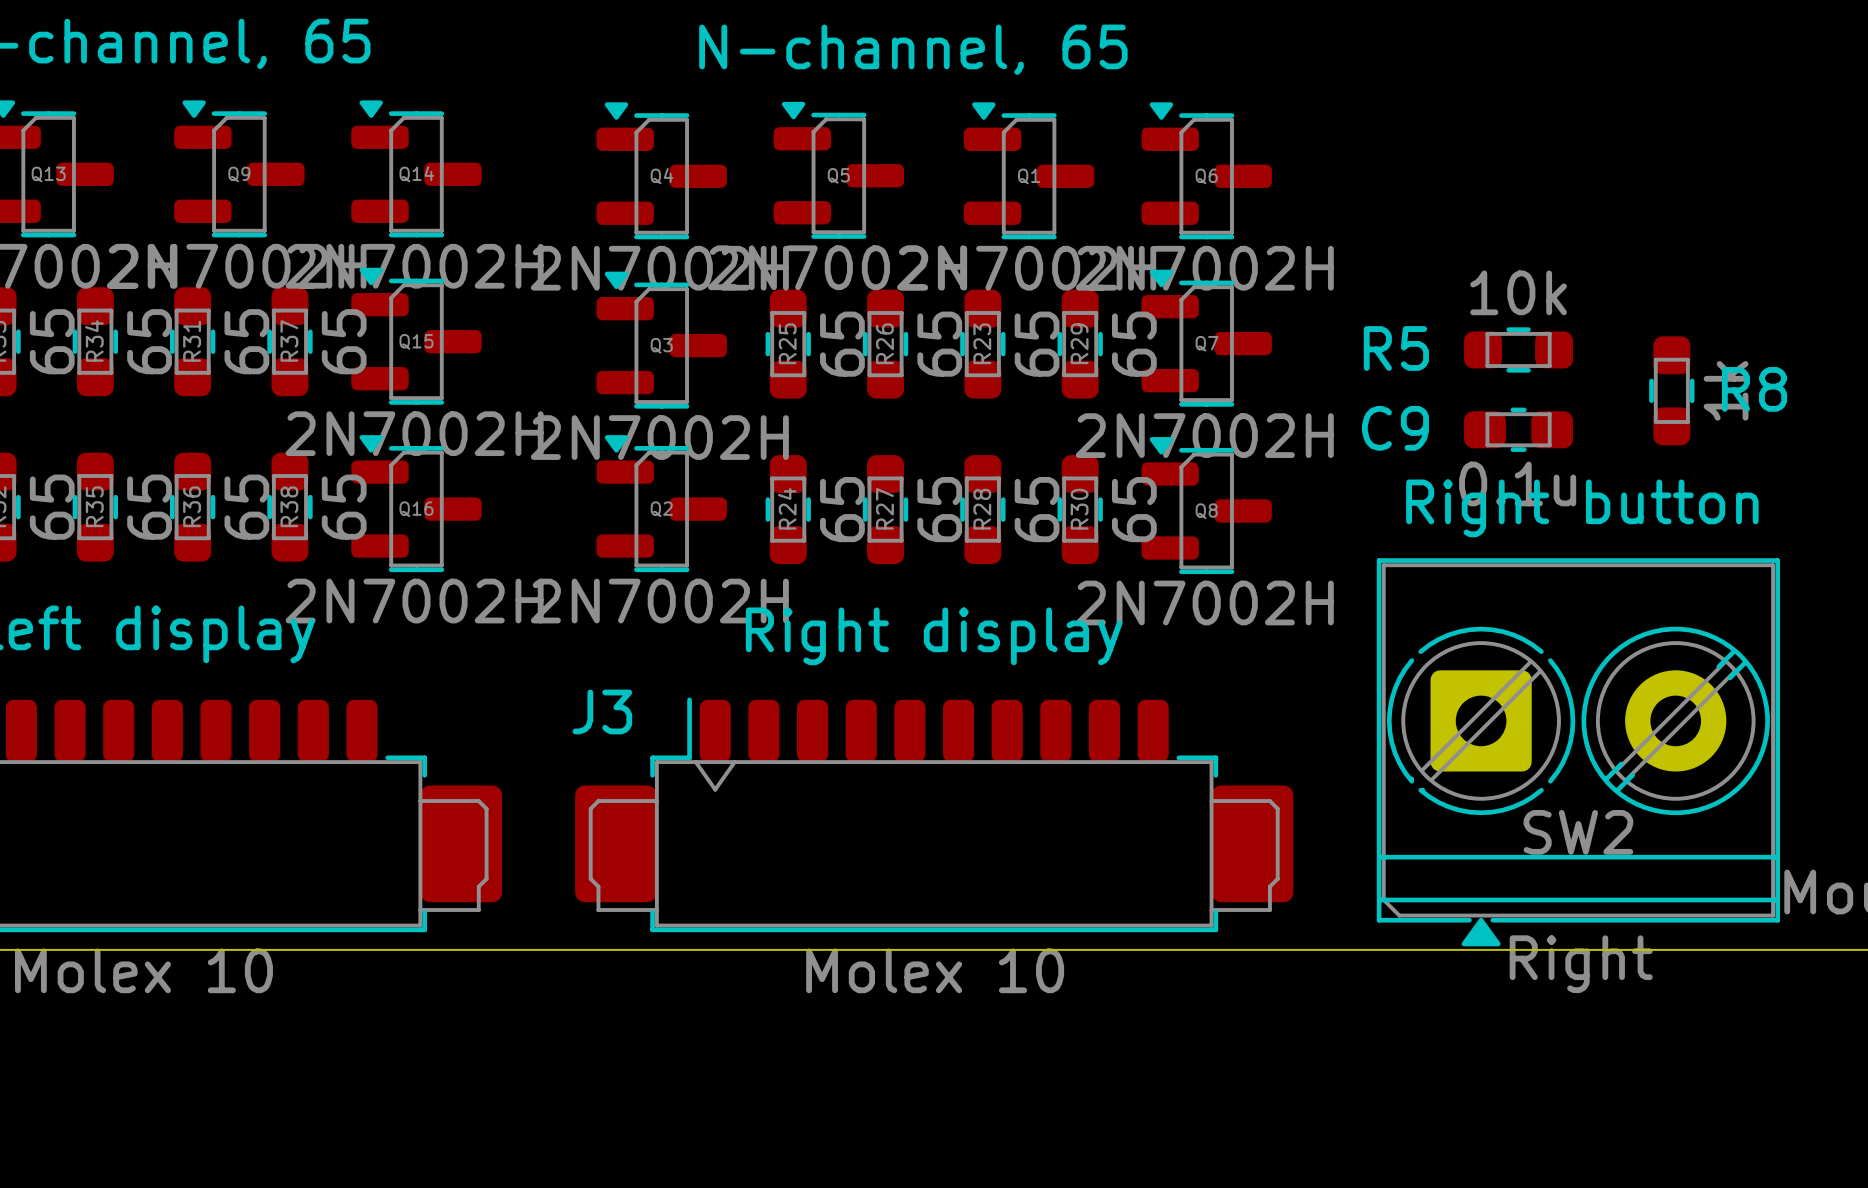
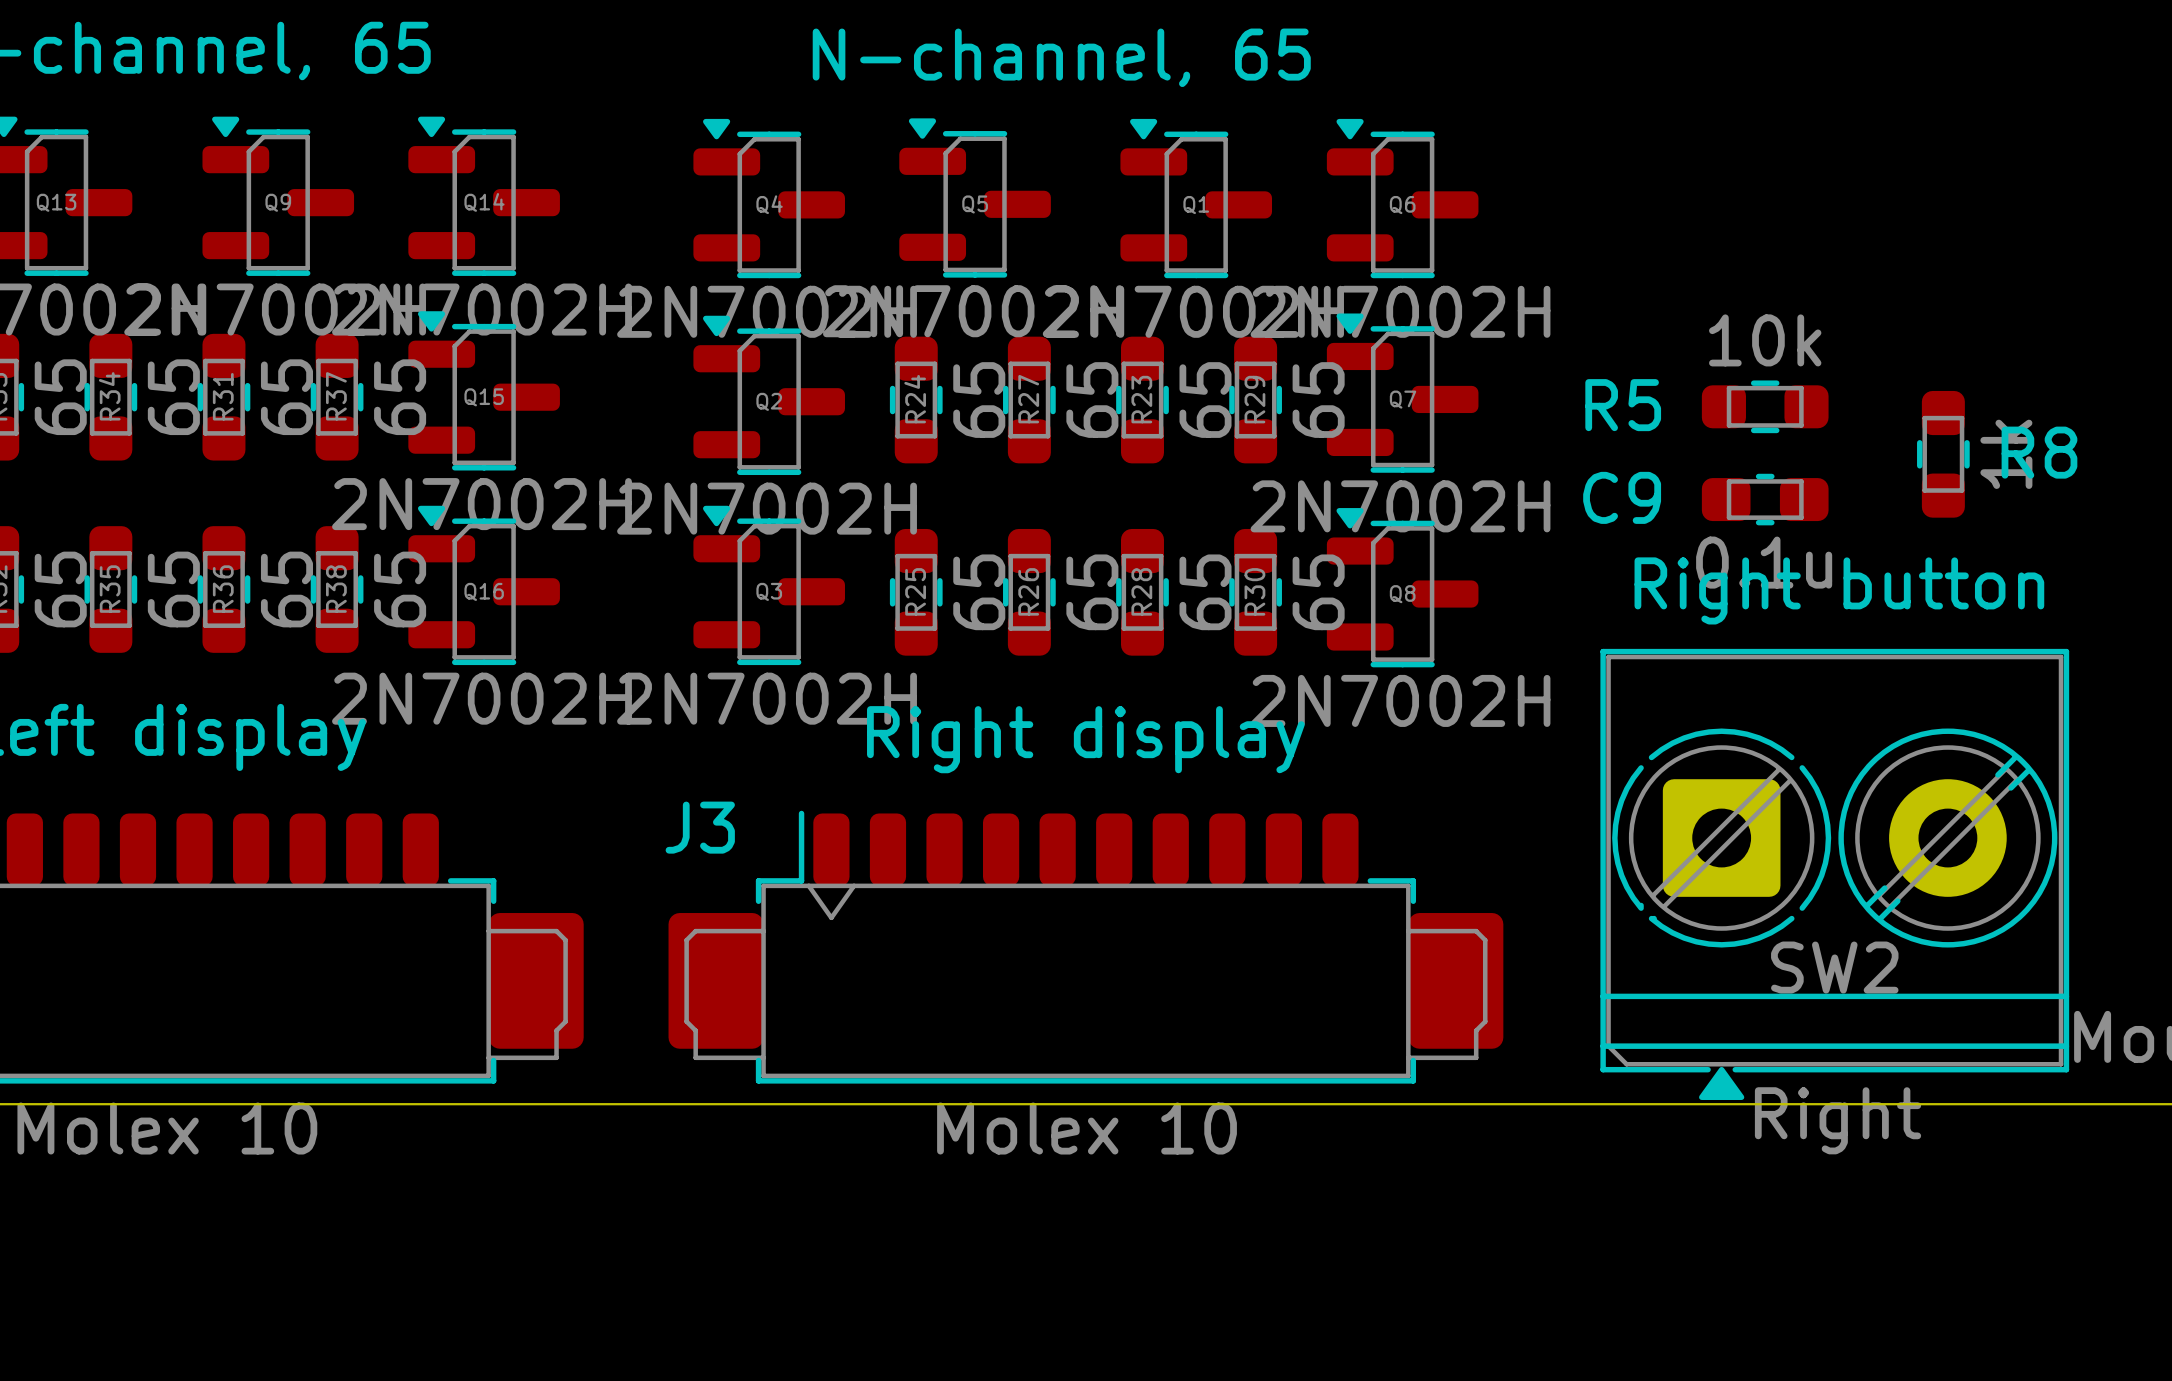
R25 name: R25 (787, 343) -> R24 (915, 399)
R26 name: R26 (884, 343) -> R27 (1028, 399)
Q3 name: Q3 (661, 345) -> Q2 (769, 401)
R24 name: R24 (787, 508) -> R25 (915, 591)
R27 name: R27 (884, 508) -> R26 (1028, 591)
Q2 name: Q2 (661, 509) -> Q3 (769, 591)

